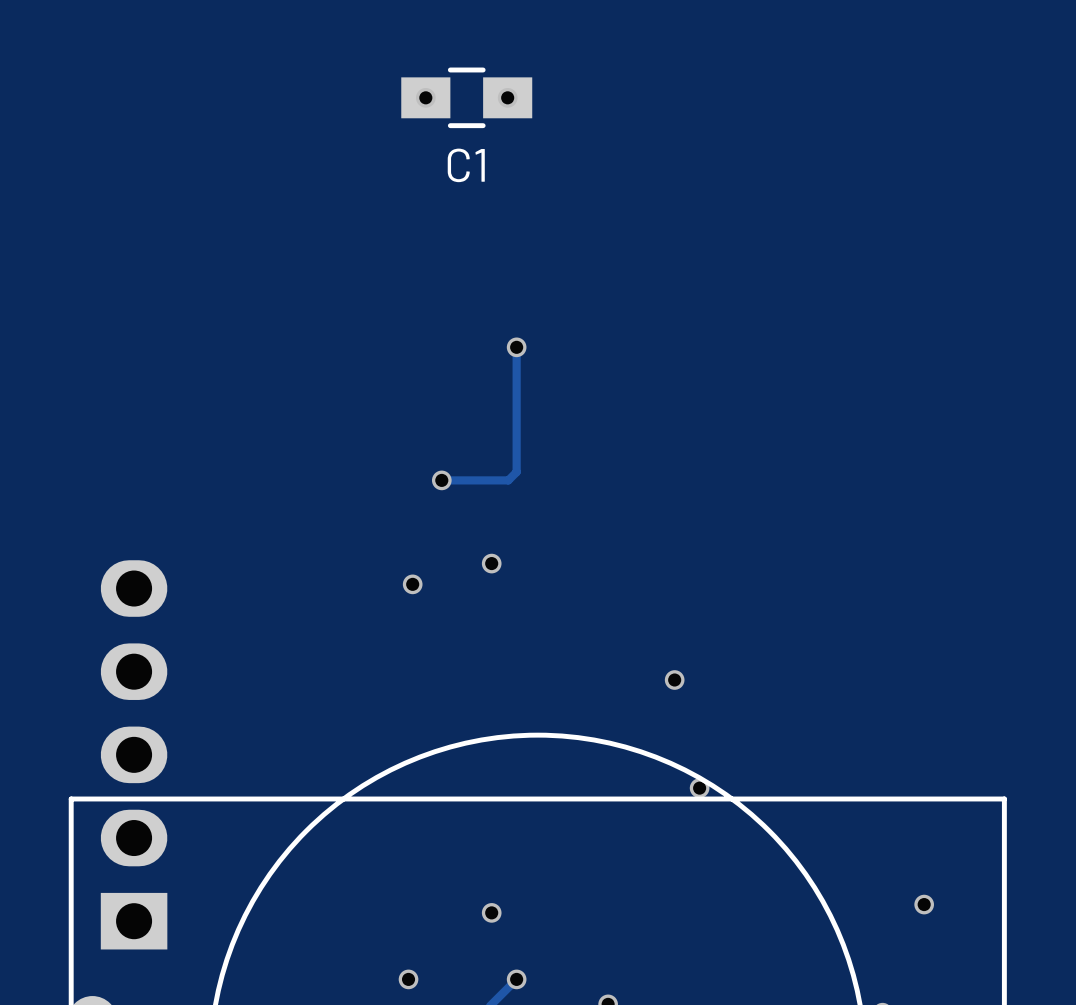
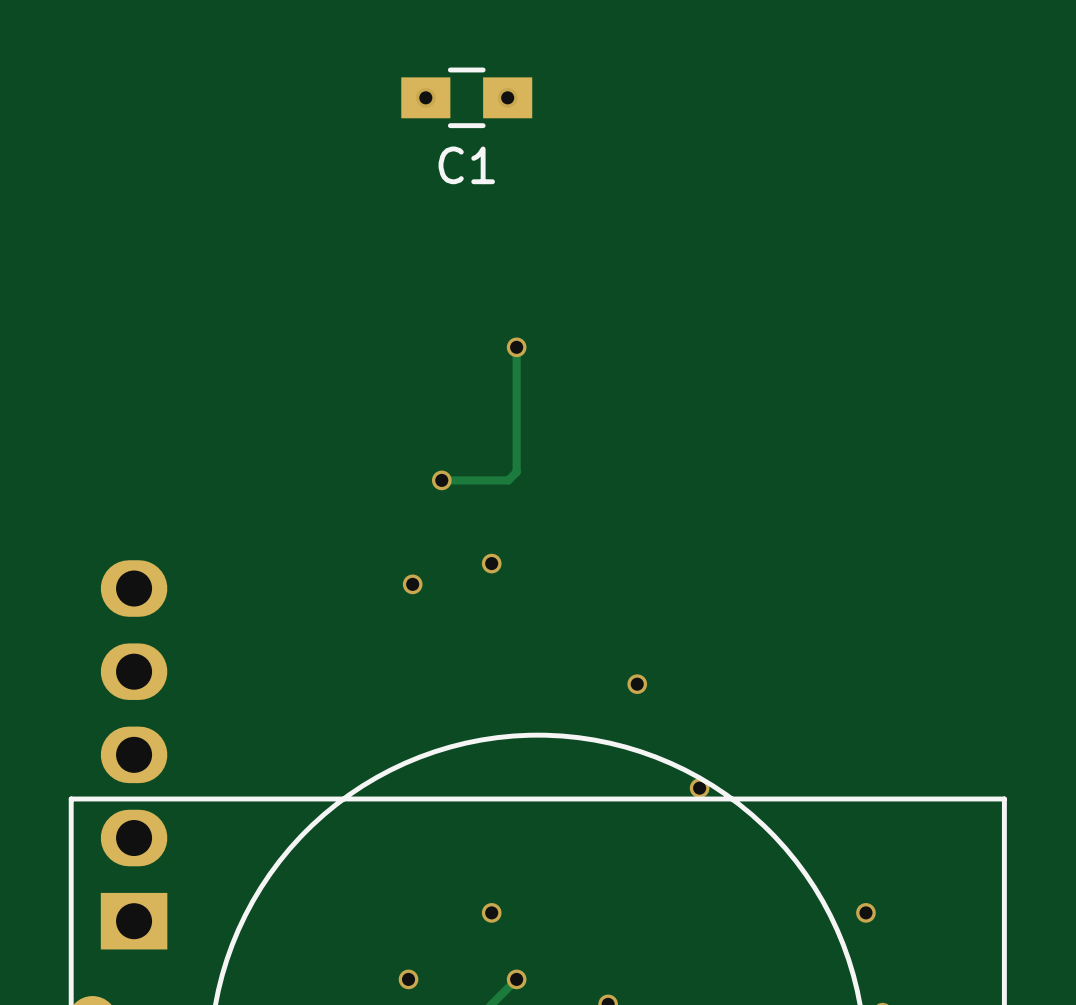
via position: (674, 680) -> (637, 684)
via position: (924, 904) -> (865, 912)

